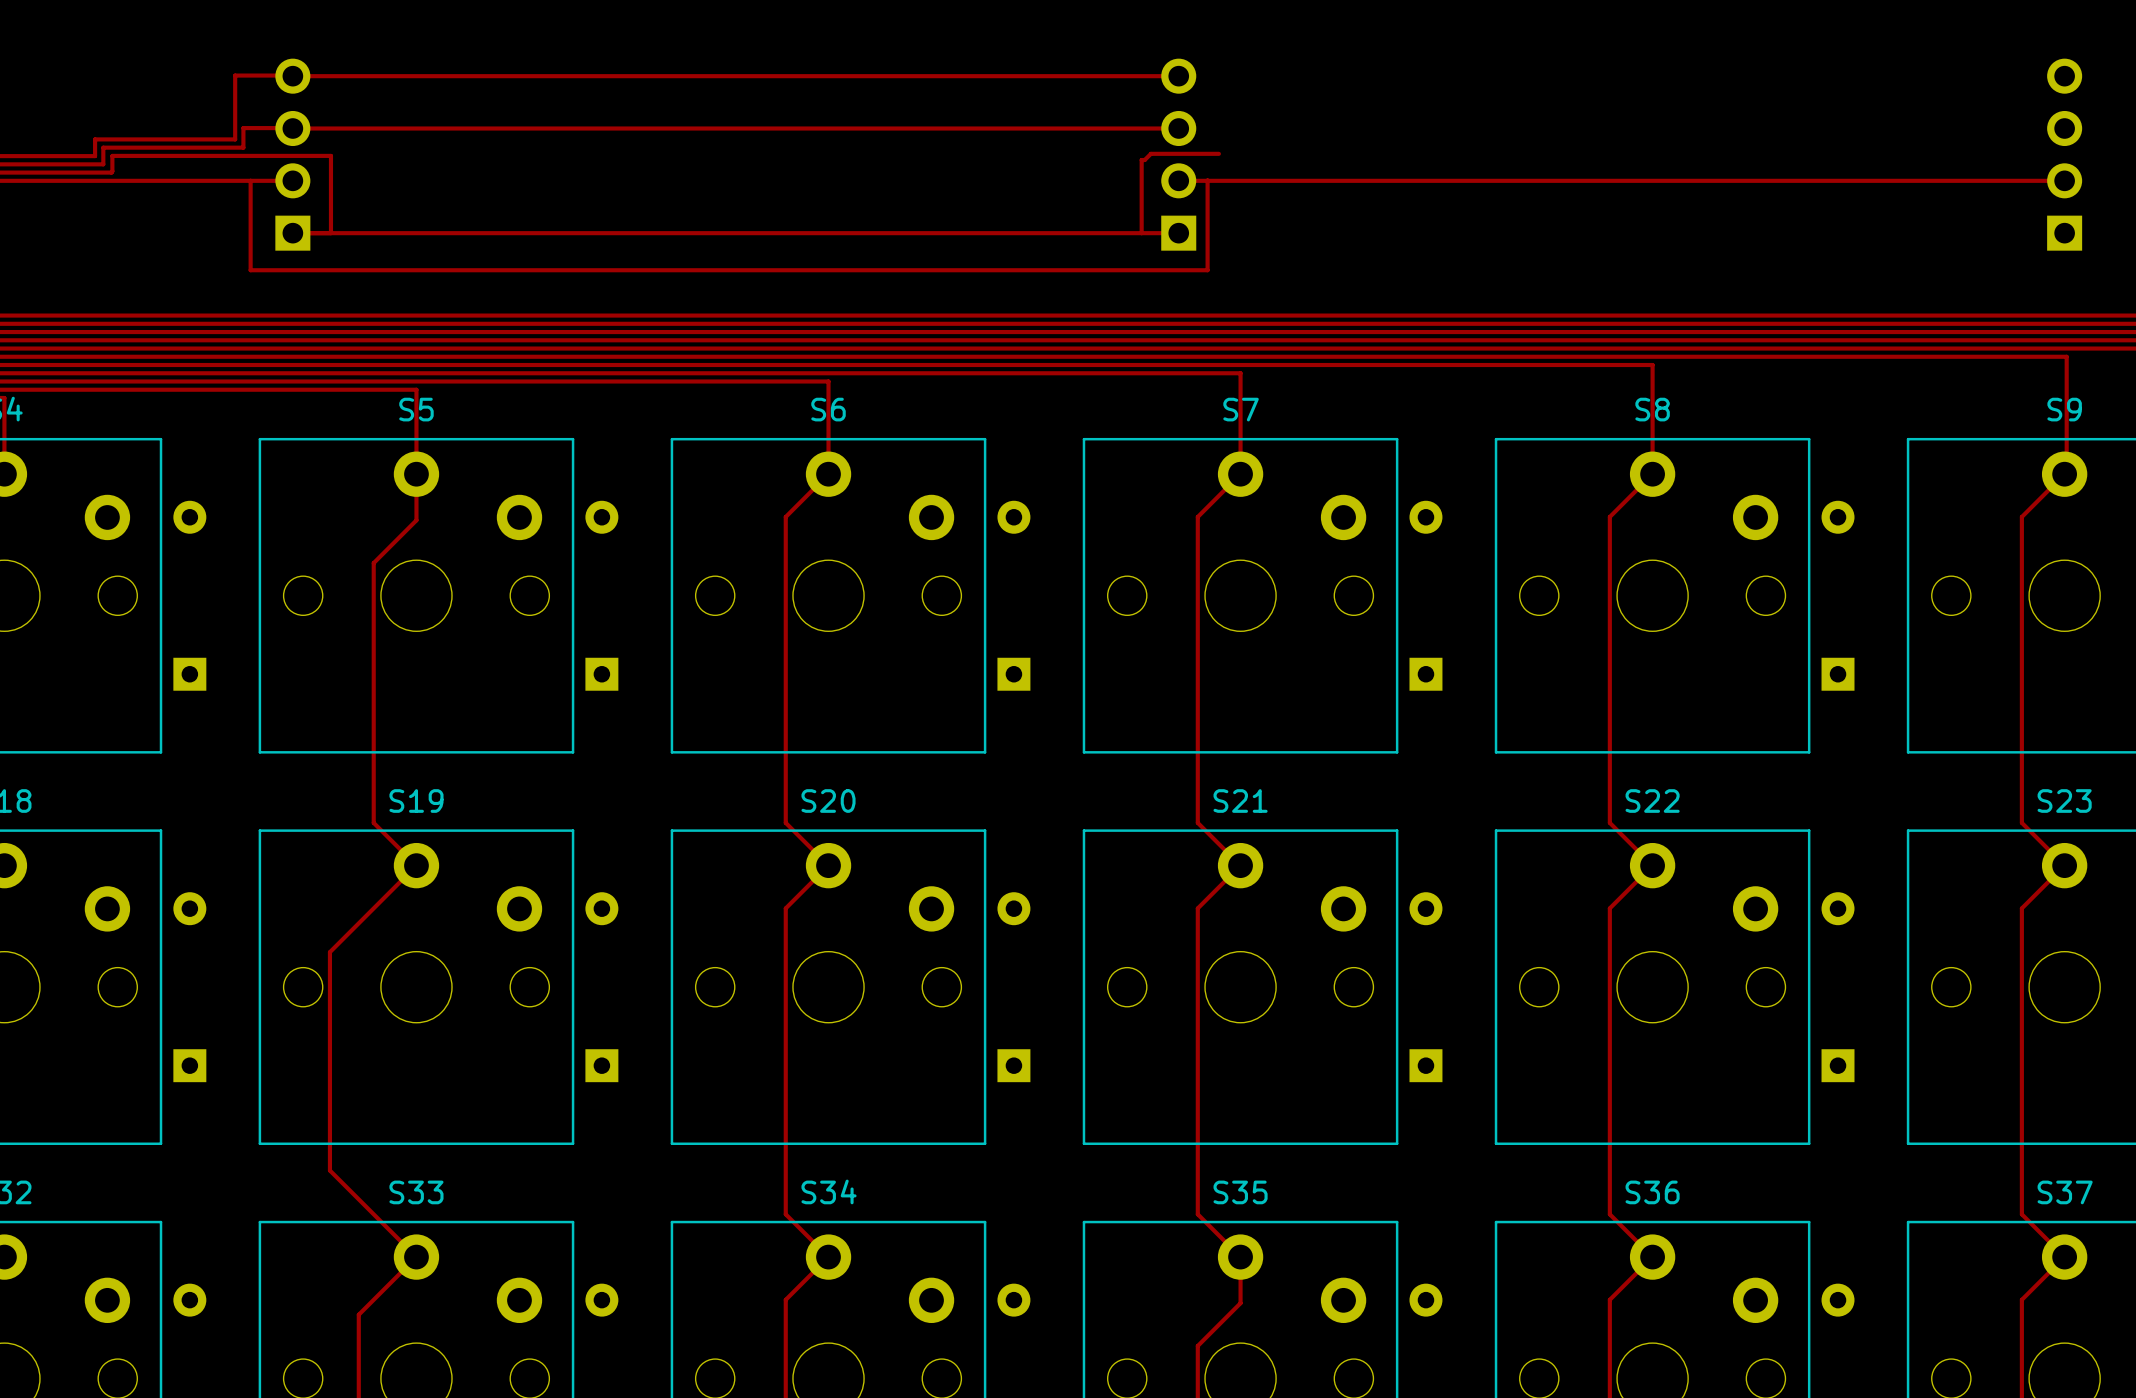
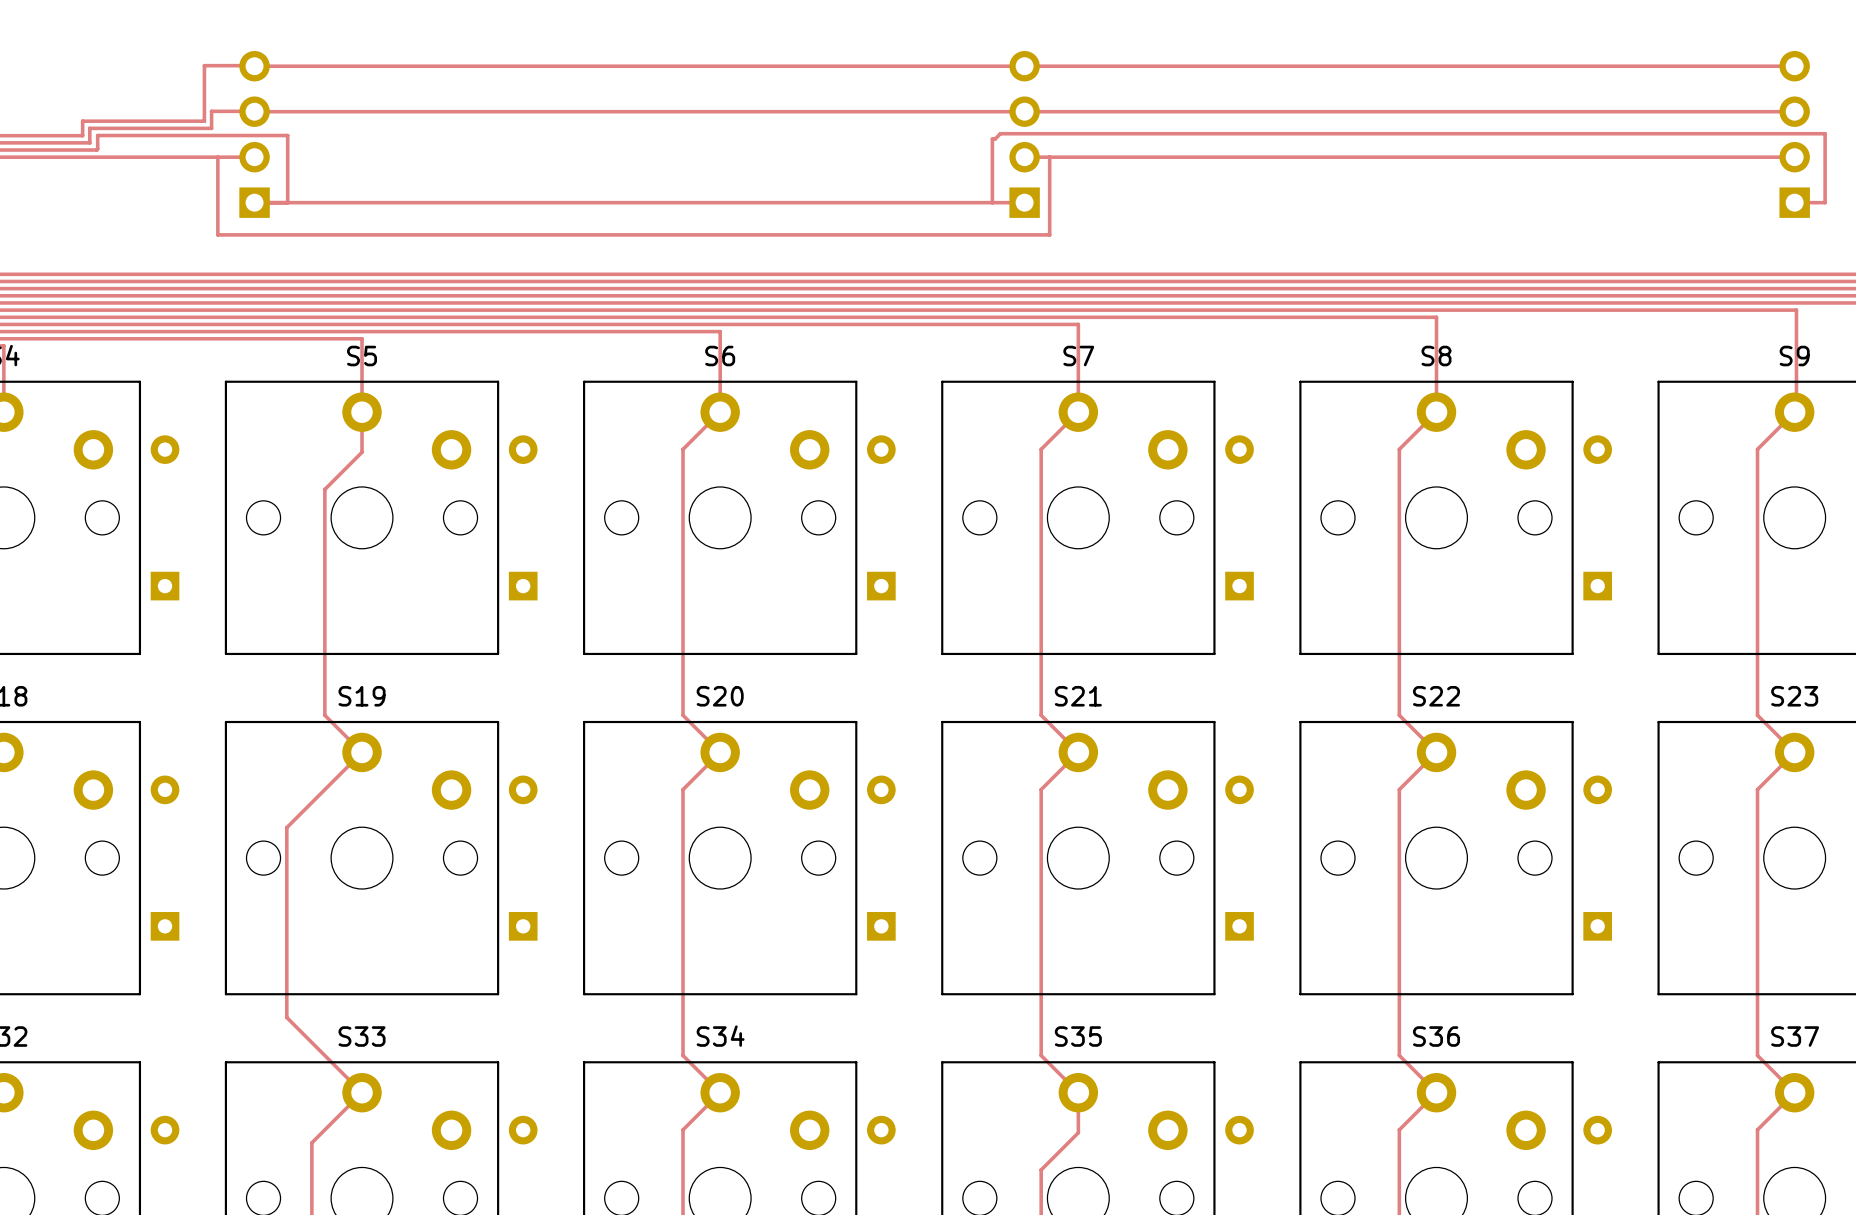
track: none -> (1024, 66) (1794, 66)
track: none -> (1024, 111) (1794, 111)
track: none -> (1059, 133) (1825, 133) (1825, 202) (1794, 202)

